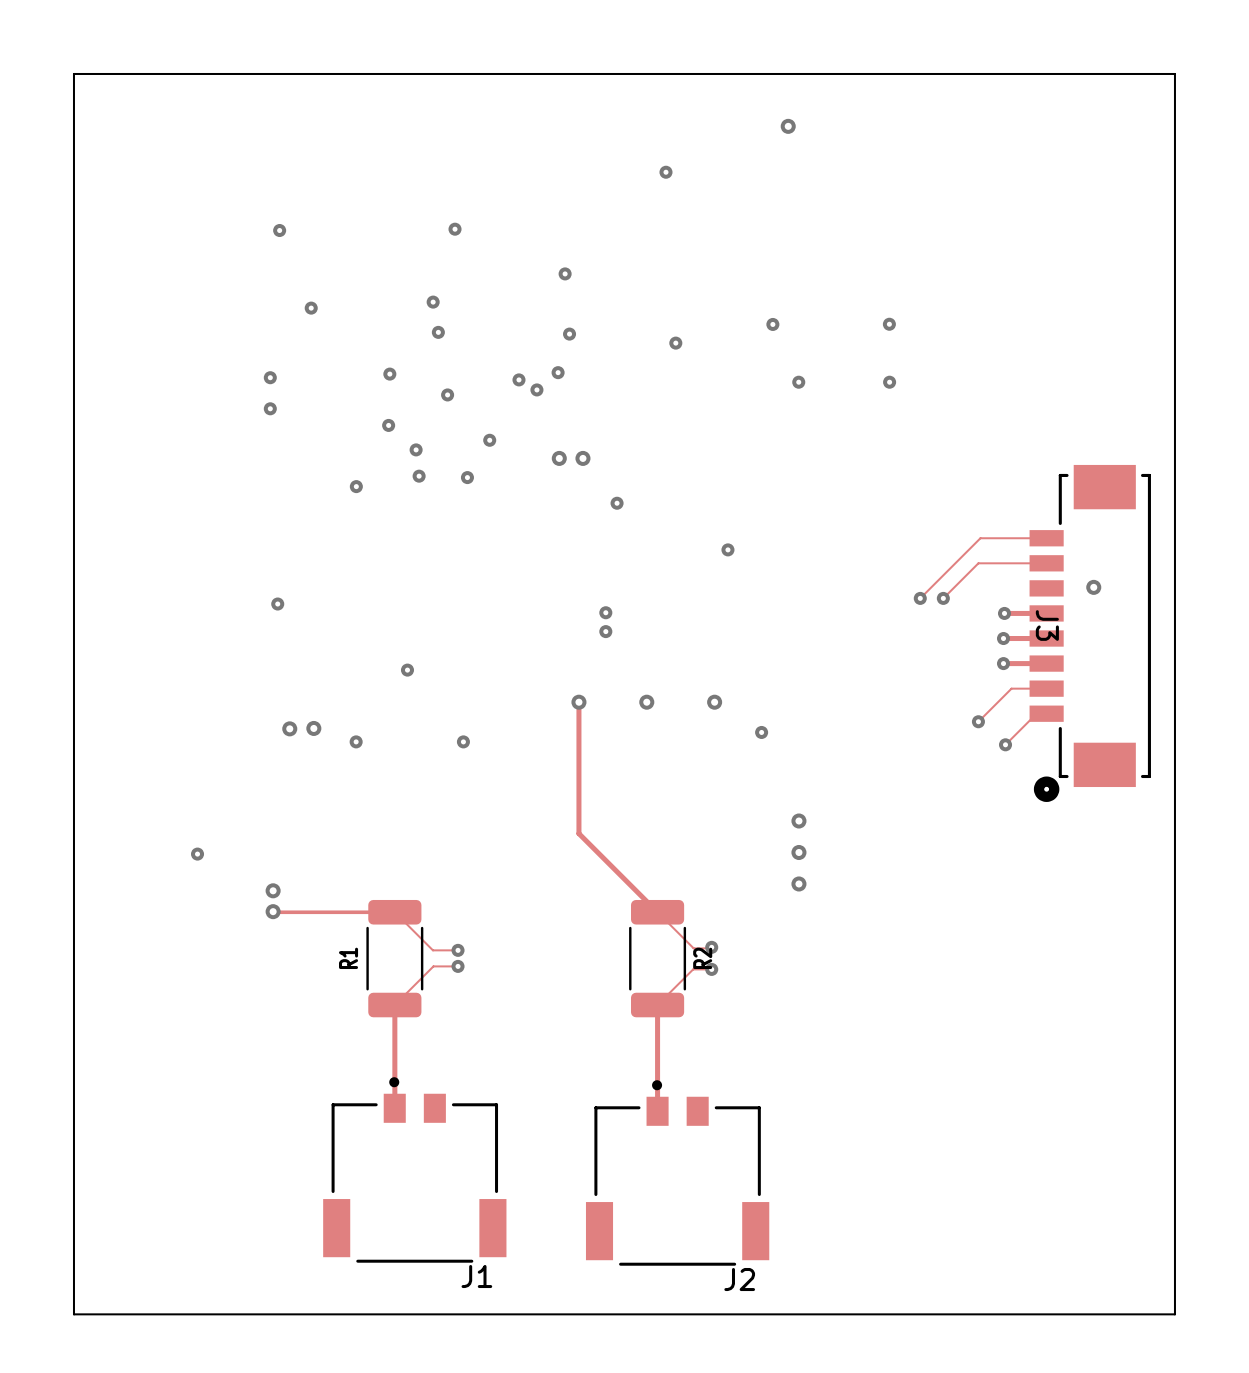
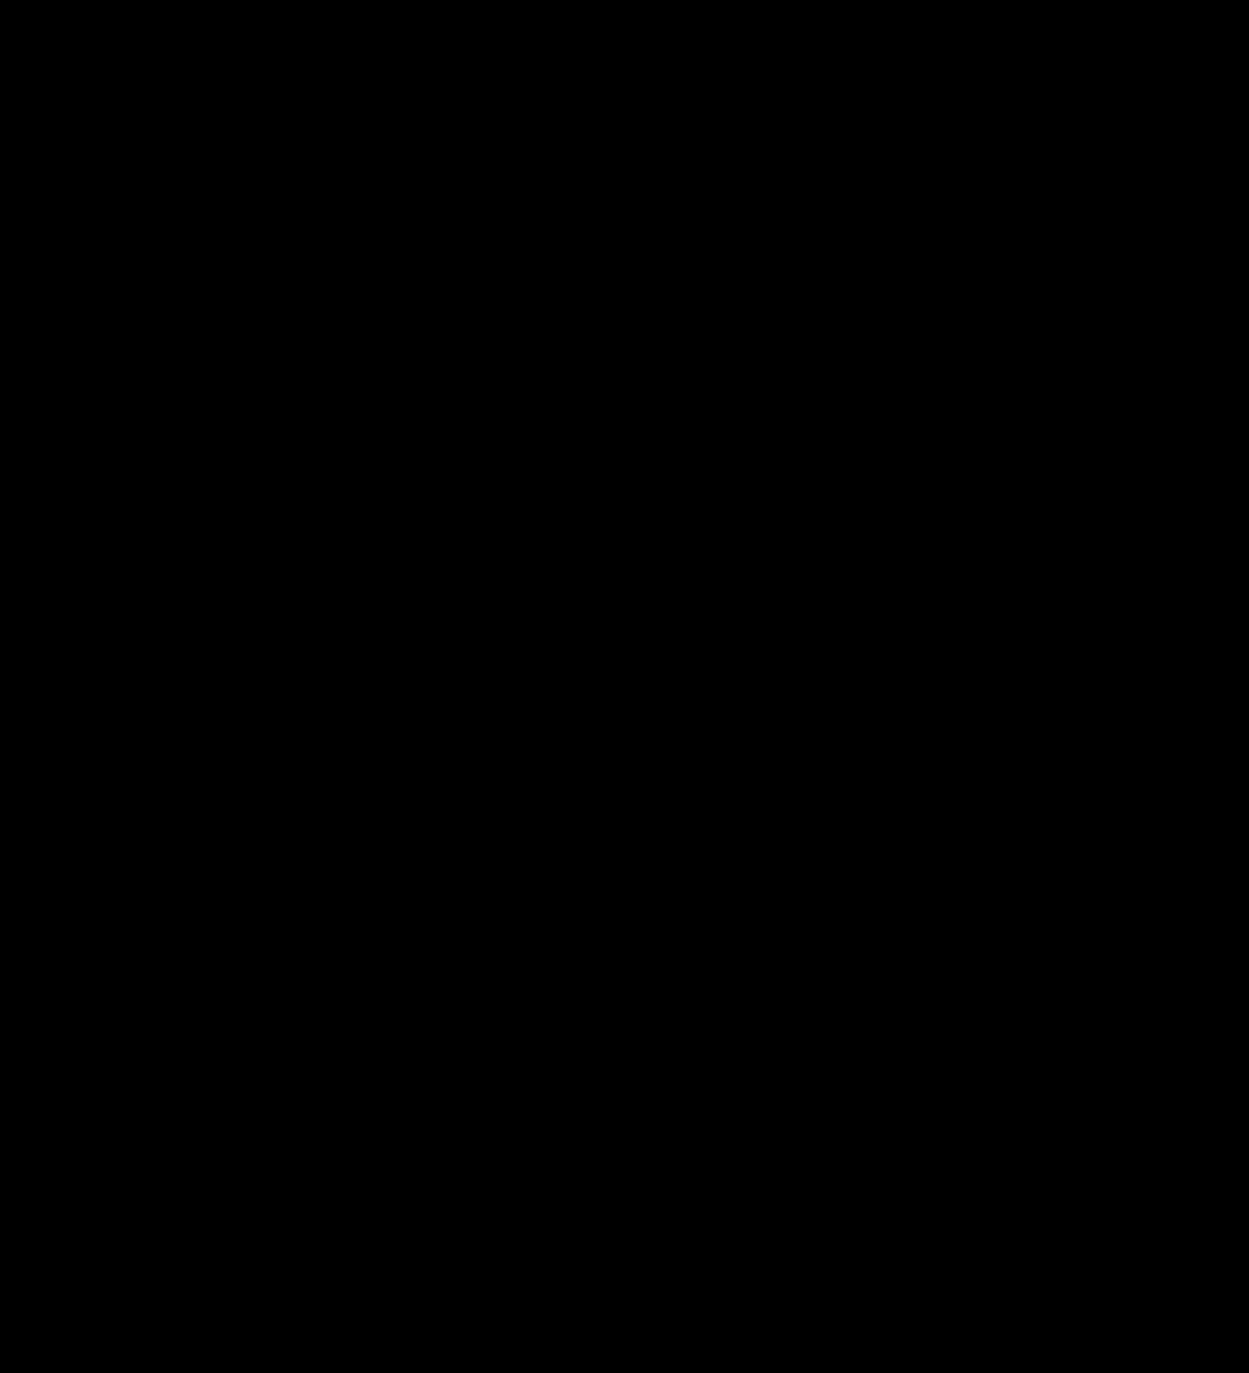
board edge: (73, 73) (1174, 73) (1174, 1314) (73, 1314) (73, 73) -> none
via: (788, 126) -> none
via: (665, 172) -> none
via: (455, 229) -> none
via: (279, 230) -> none
via: (565, 273) -> none
via: (433, 302) -> none
via: (311, 308) -> none
via: (772, 324) -> none
via: (889, 324) -> none
via: (438, 332) -> none
via: (569, 334) -> none
via: (675, 343) -> none
via: (558, 372) -> none
via: (389, 374) -> none
via: (270, 377) -> none
via: (518, 379) -> none
via: (798, 382) -> none
via: (889, 382) -> none
via: (536, 389) -> none
via: (447, 394) -> none
via: (270, 408) -> none
via: (388, 425) -> none
via: (489, 440) -> none
via: (416, 449) -> none
via: (559, 458) -> none
via: (582, 458) -> none
via: (419, 476) -> none
via: (467, 477) -> none
via: (356, 486) -> none
via: (617, 503) -> none
track: (1046, 538) (980, 538) (920, 598) (922, 598) -> none
via: (727, 549) -> none
track: (1046, 563) (978, 563) (943, 598) -> none
via: (1093, 587) -> none
via: (920, 598) -> none
via: (943, 598) -> none
via: (277, 604) -> none
via: (605, 612) -> none
track: (1004, 613) (1046, 613) -> none
via: (1004, 613) -> none
via: (605, 631) -> none
J3: (1090, 633) -> none
track: (1003, 638) (1046, 638) -> none
via: (1003, 638) -> none
track: (1003, 663) (1046, 663) -> none
via: (1003, 663) -> none
via: (407, 670) -> none
track: (1046, 688) (1011, 688) (978, 721) -> none
track: (578, 702) (578, 833) (693, 948) (711, 947) -> none
via: (578, 702) -> none
via: (646, 702) -> none
via: (714, 702) -> none
track: (1046, 713) (1036, 713) (1005, 744) -> none
via: (978, 721) -> none
via: (289, 728) -> none
via: (313, 728) -> none
via: (761, 732) -> none
via: (356, 741) -> none
via: (463, 741) -> none
via: (1005, 744) -> none
via: (798, 821) -> none
via: (798, 852) -> none
via: (197, 854) -> none
via: (798, 883) -> none
via: (273, 890) -> none
track: (273, 911) (394, 912) -> none
via: (273, 911) -> none
track: (394, 912) (432, 950) (458, 950) -> none
via: (711, 947) -> none
via: (458, 950) -> none
R1: (394, 958) -> none
R2: (657, 958) -> none
track: (458, 966) (433, 966) (394, 1005) (394, 1108) -> none
via: (458, 966) -> none
track: (711, 969) (693, 969) (657, 1005) (657, 1111) -> none
via: (711, 969) -> none
J1: (414, 1169) -> none
J2: (677, 1172) -> none

